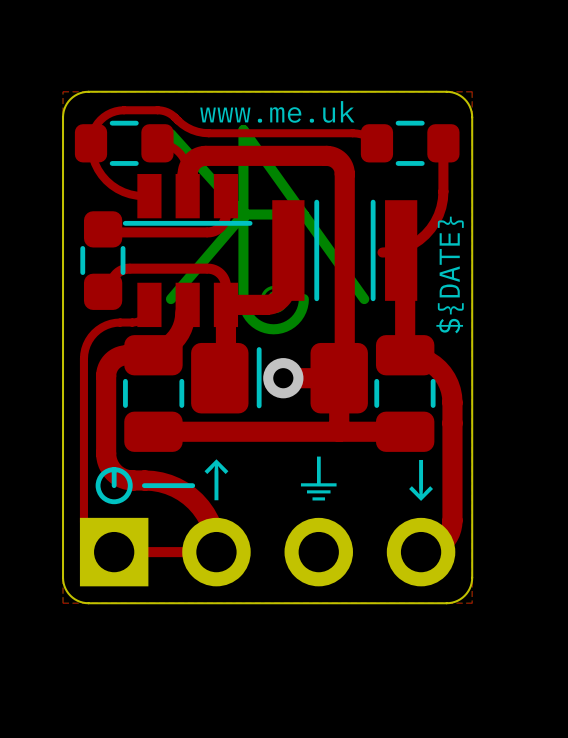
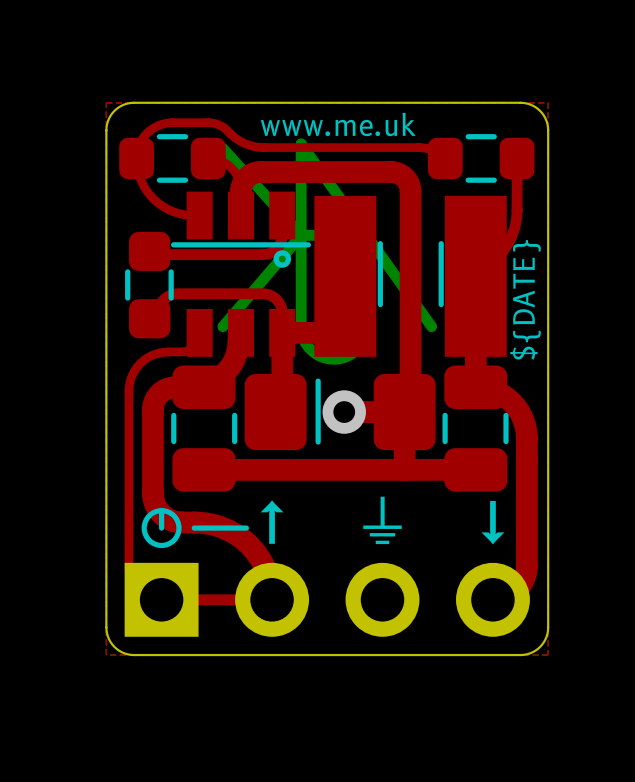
part footprint: [83, 145, 435, 452] -> [129, 161, 508, 492]
drawing shape: [314, 199, 376, 302] -> [377, 241, 444, 308]

